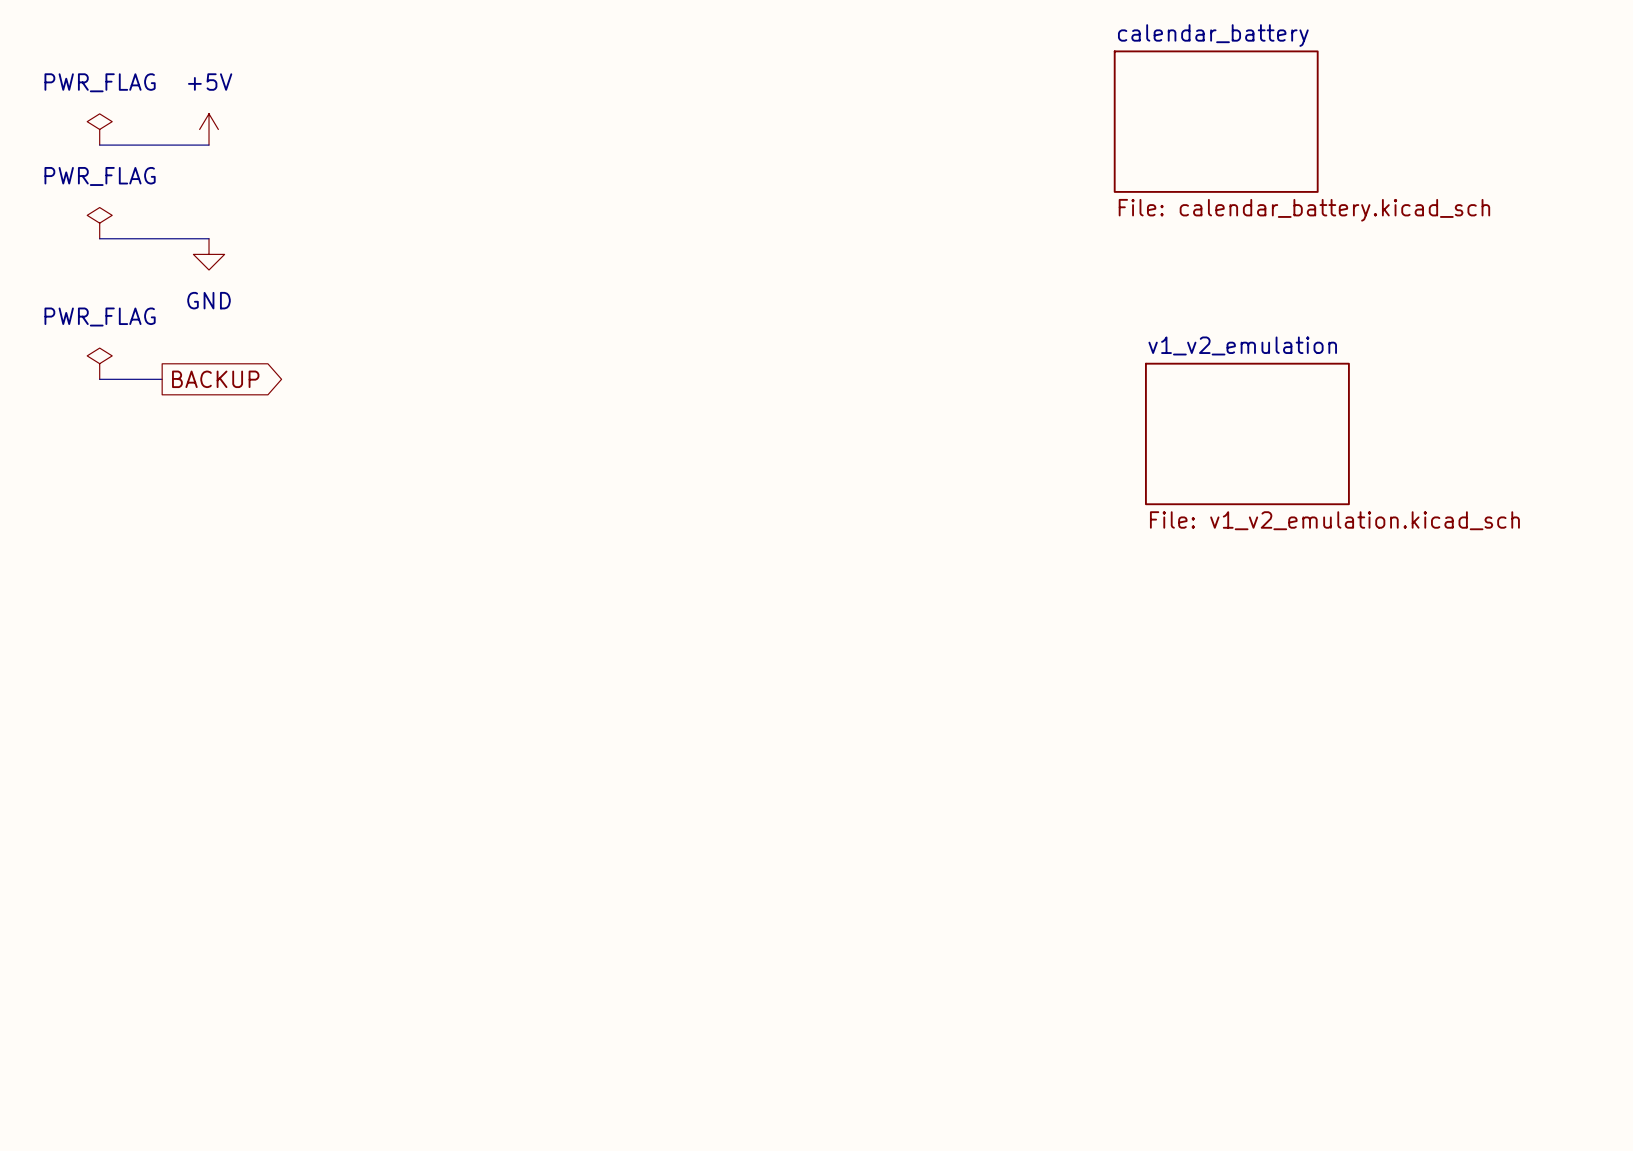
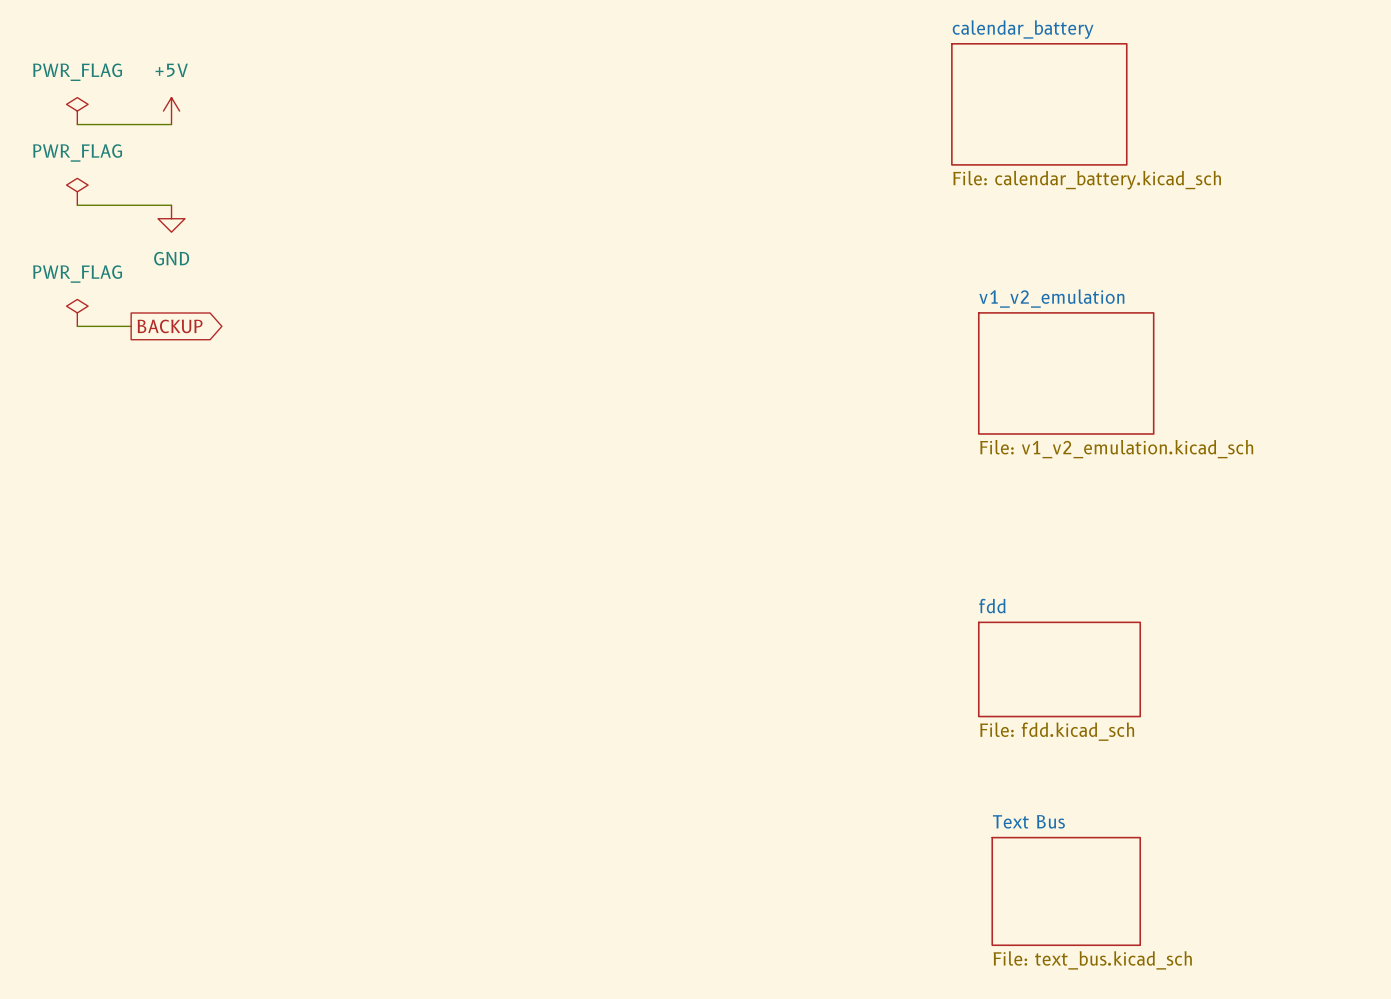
sheet fdd: none -> File: fdd.kicad_sch (1059, 669)
sheet Text Bus: none -> File: text_bus.kicad_sch (1066, 891)

